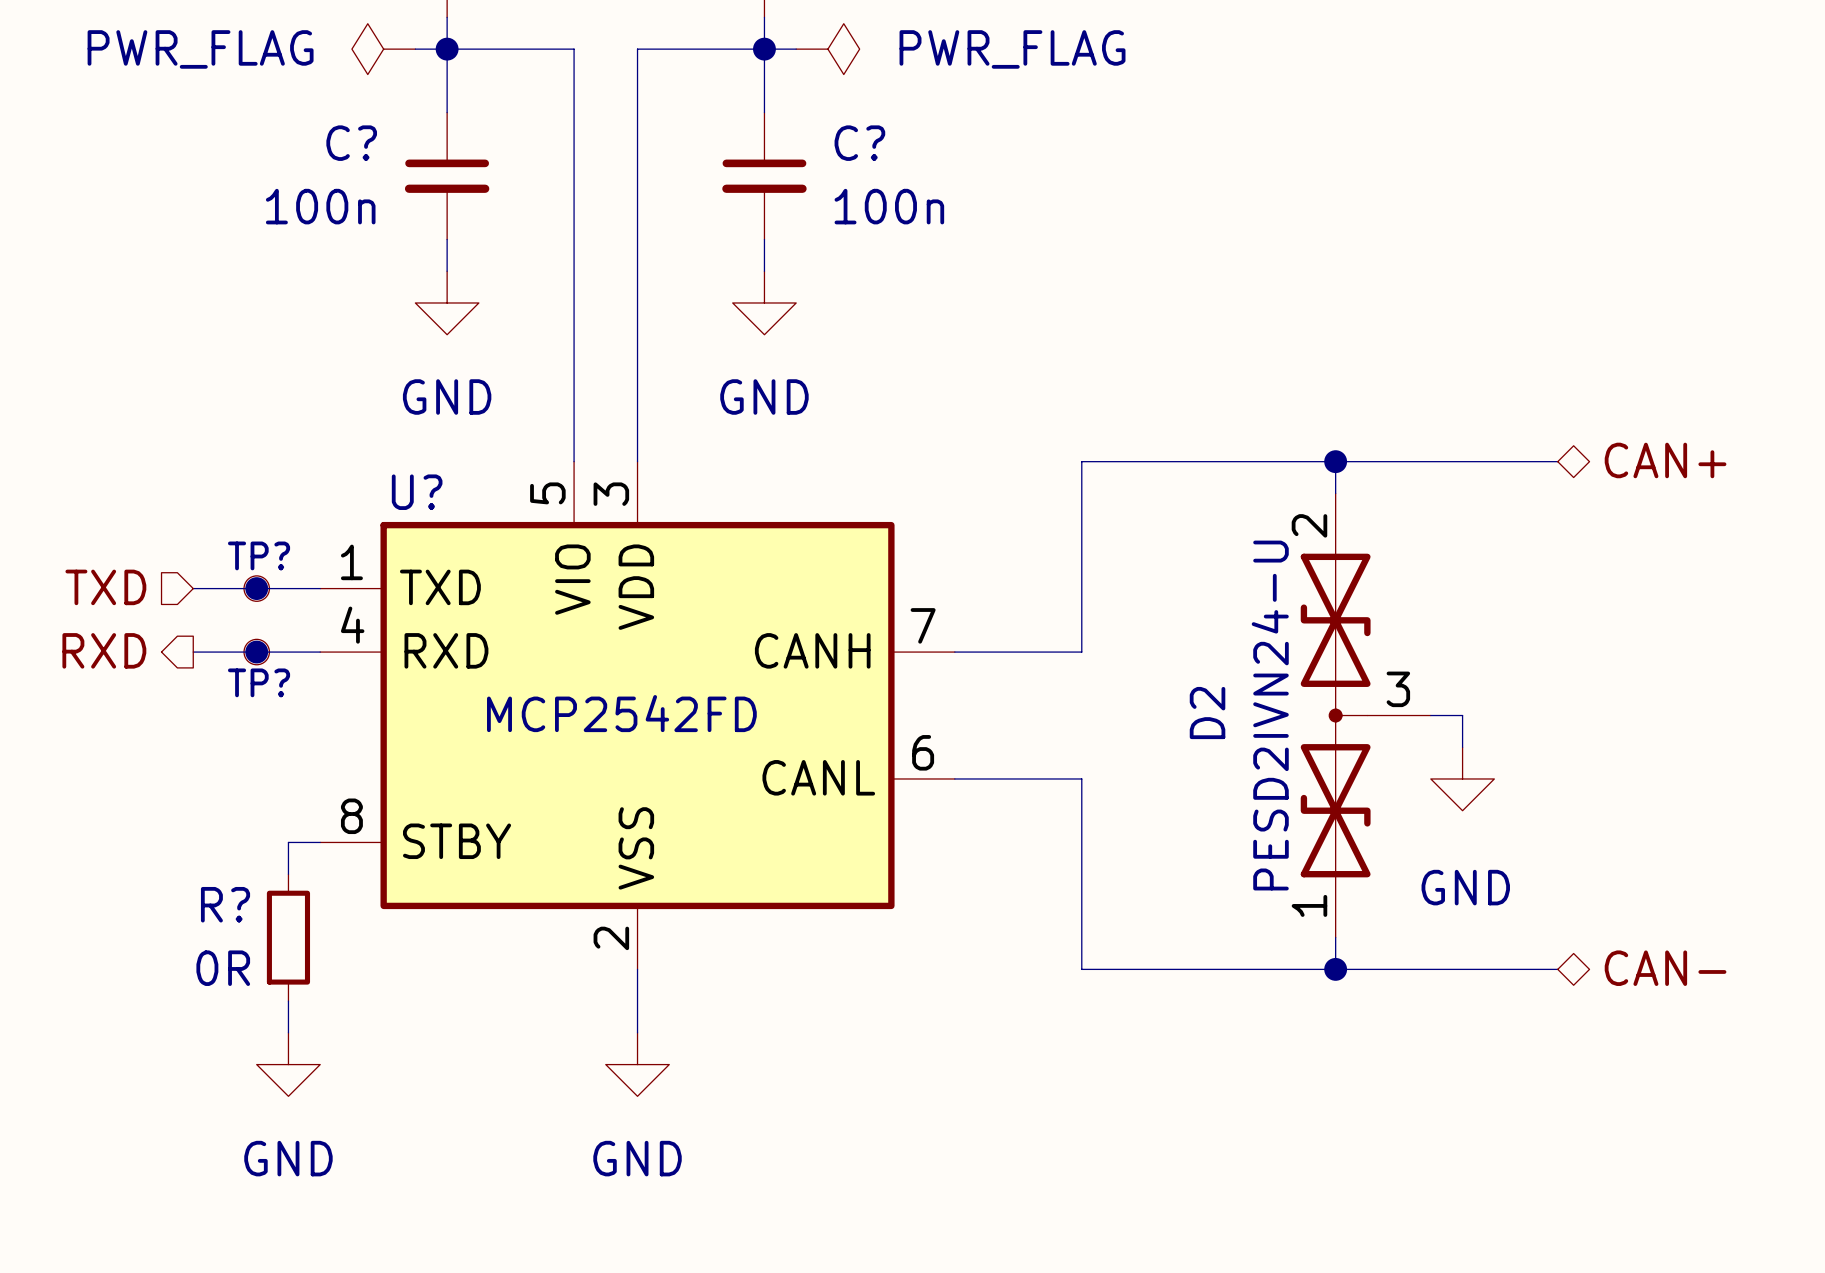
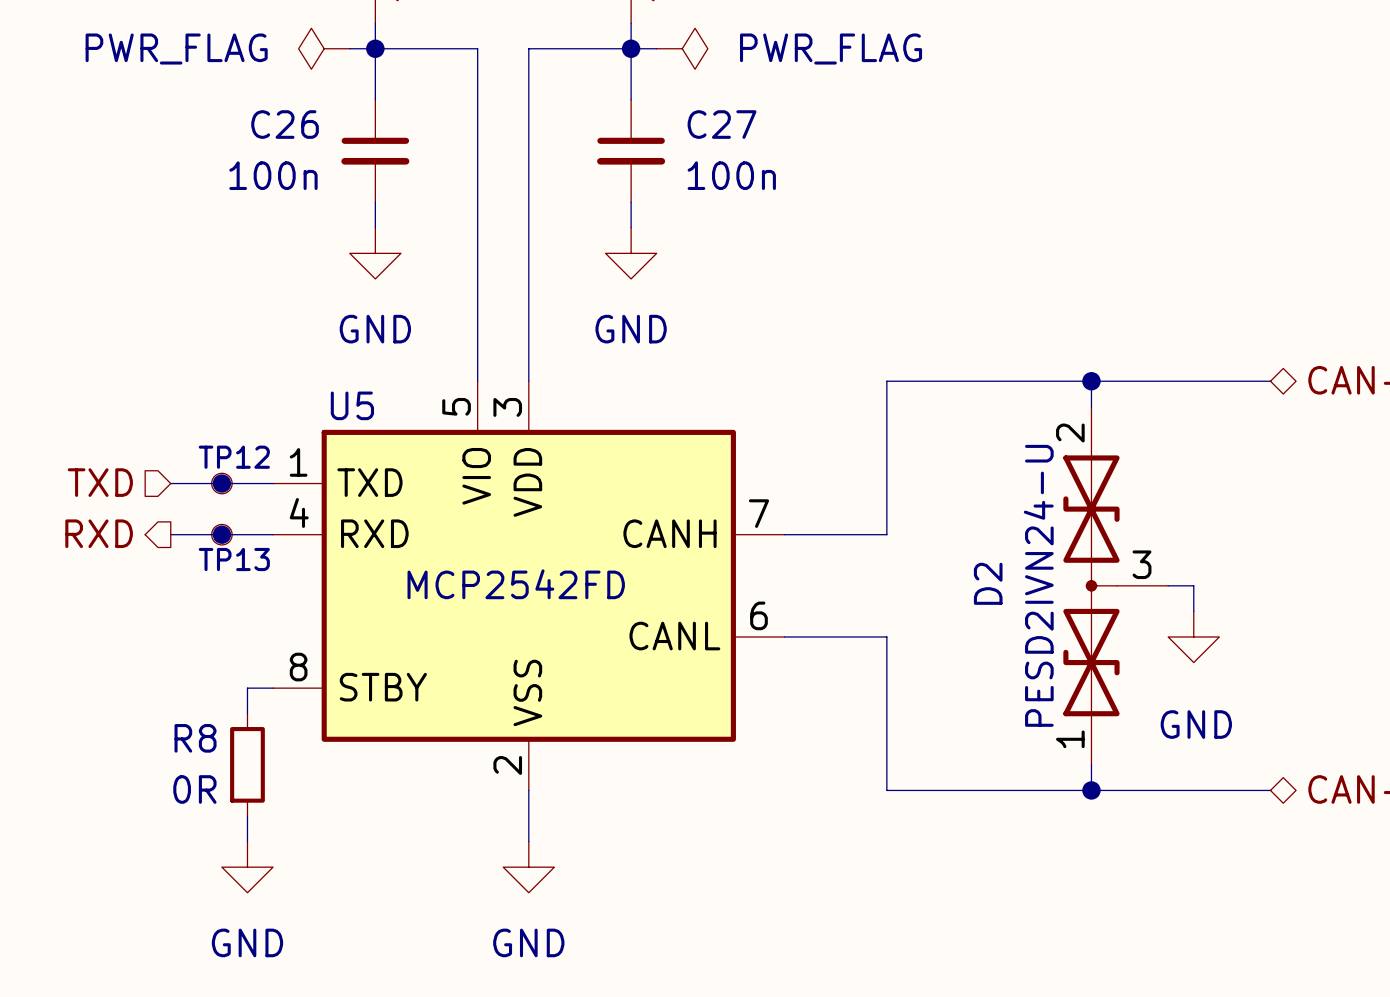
C? name: C? (351, 143) -> C26 (285, 124)
C? name: C? (859, 143) -> C27 (722, 124)
U? name: U? (417, 492) -> U5 (352, 405)
TP? name: TP? (259, 555) -> TP12 (234, 457)
TP? name: TP? (259, 682) -> TP13 (234, 559)
R? name: R? (225, 904) -> R8 (195, 738)

